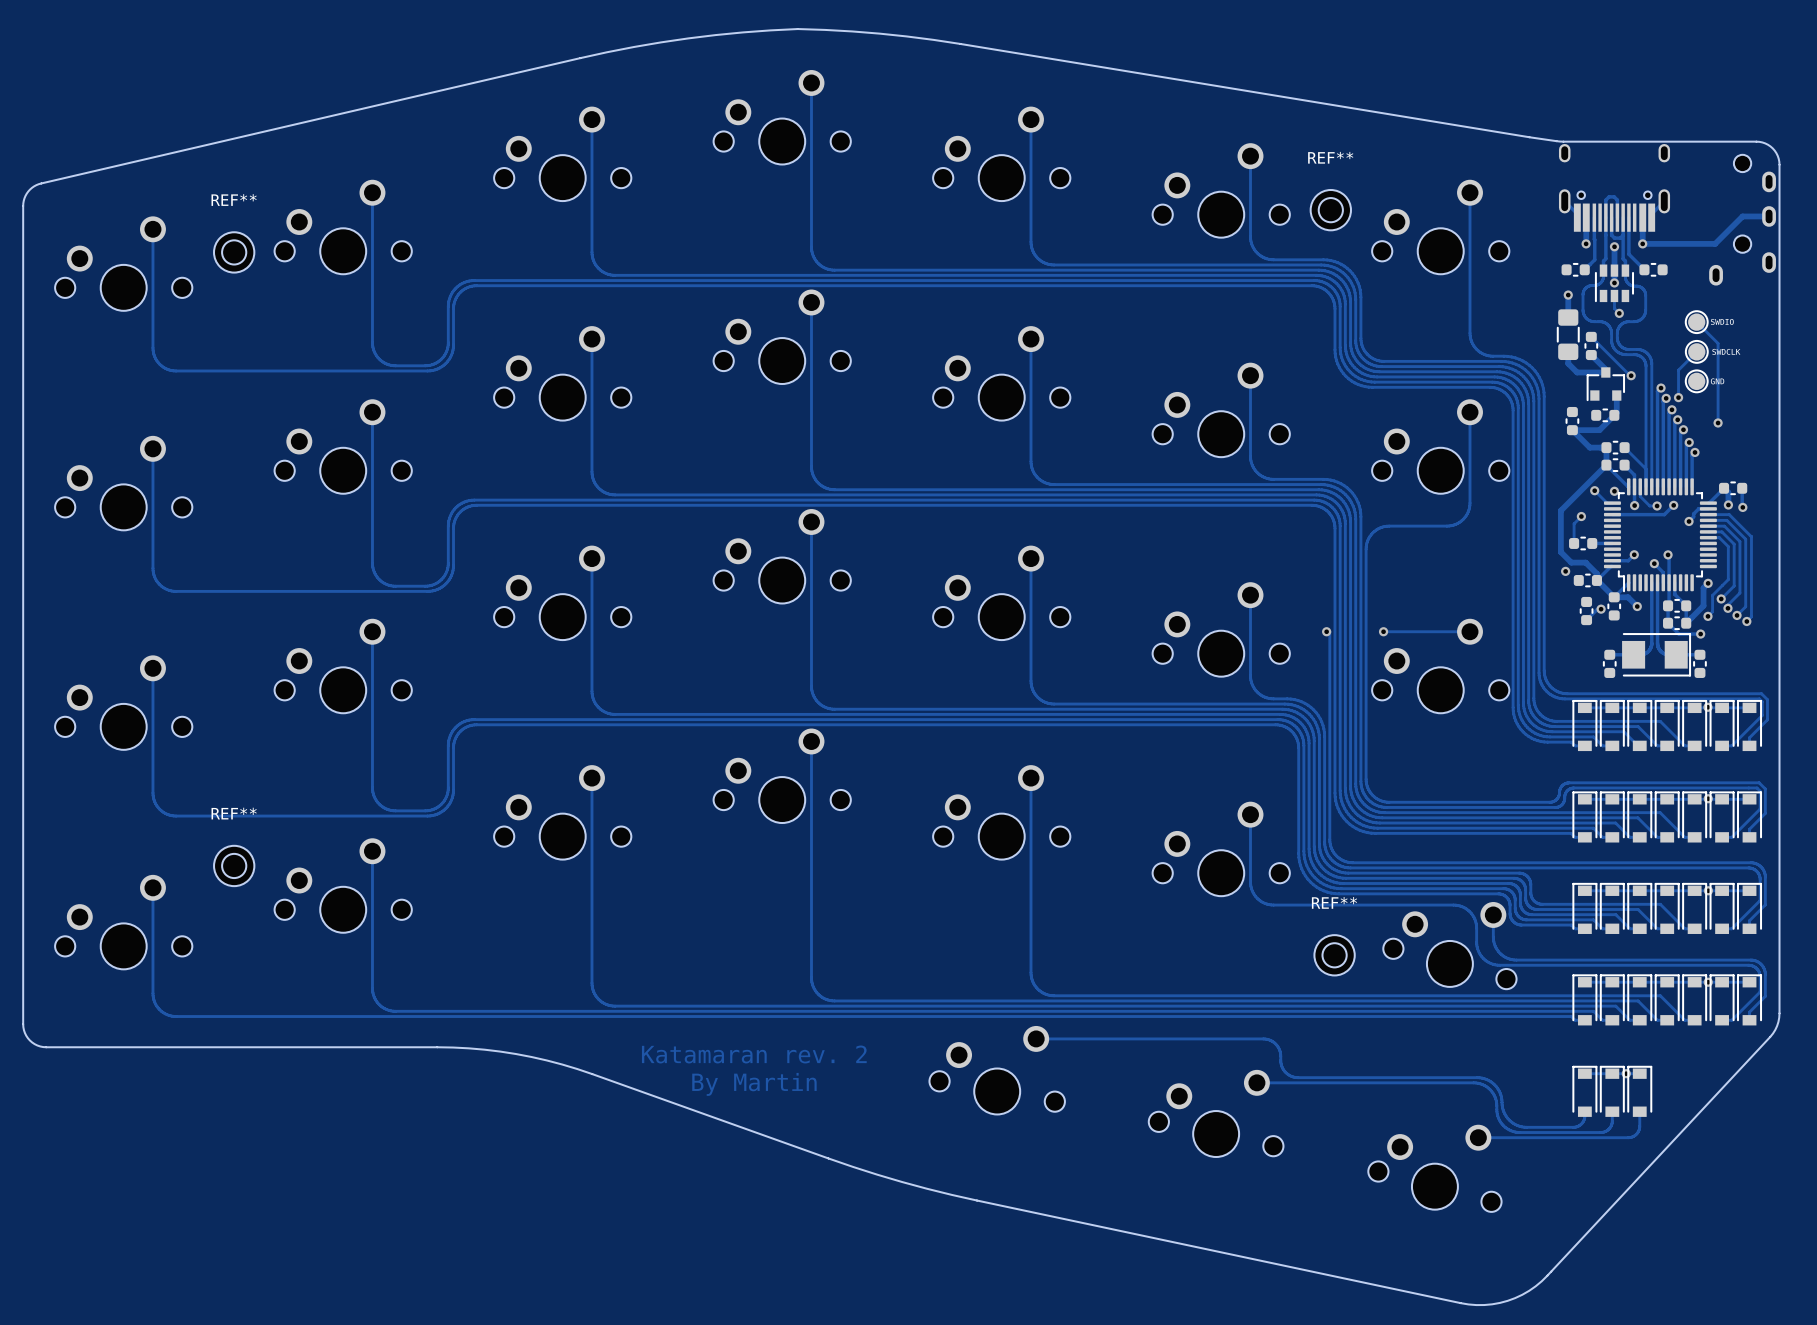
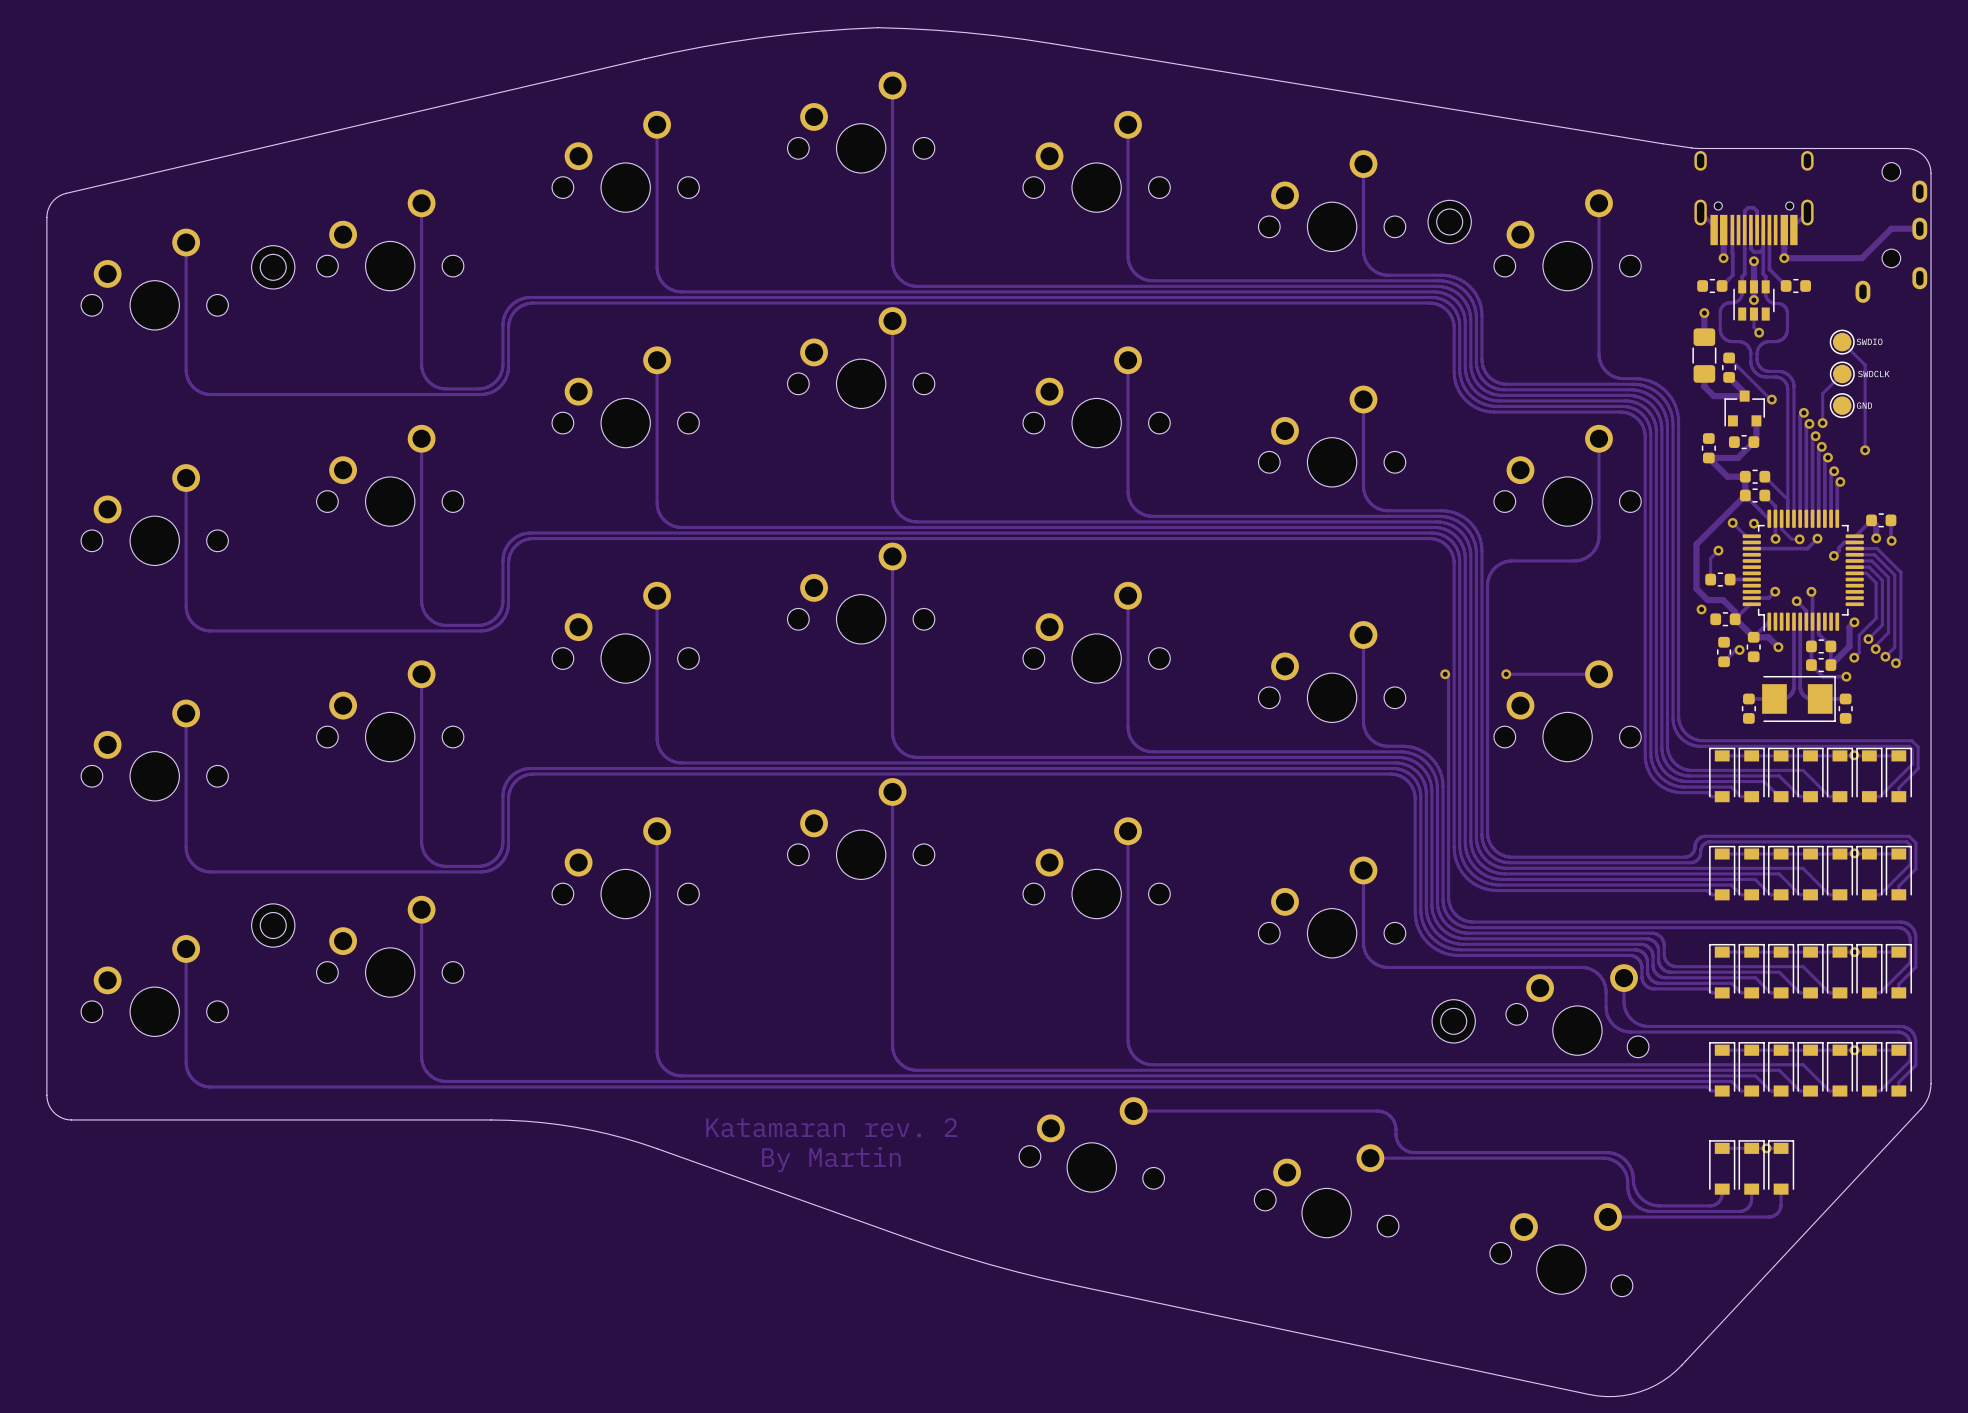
REF** name: REF** (1330, 157) -> none
REF** name: REF** (234, 200) -> none
REF** name: REF** (234, 813) -> none
REF** name: REF** (1334, 902) -> none

